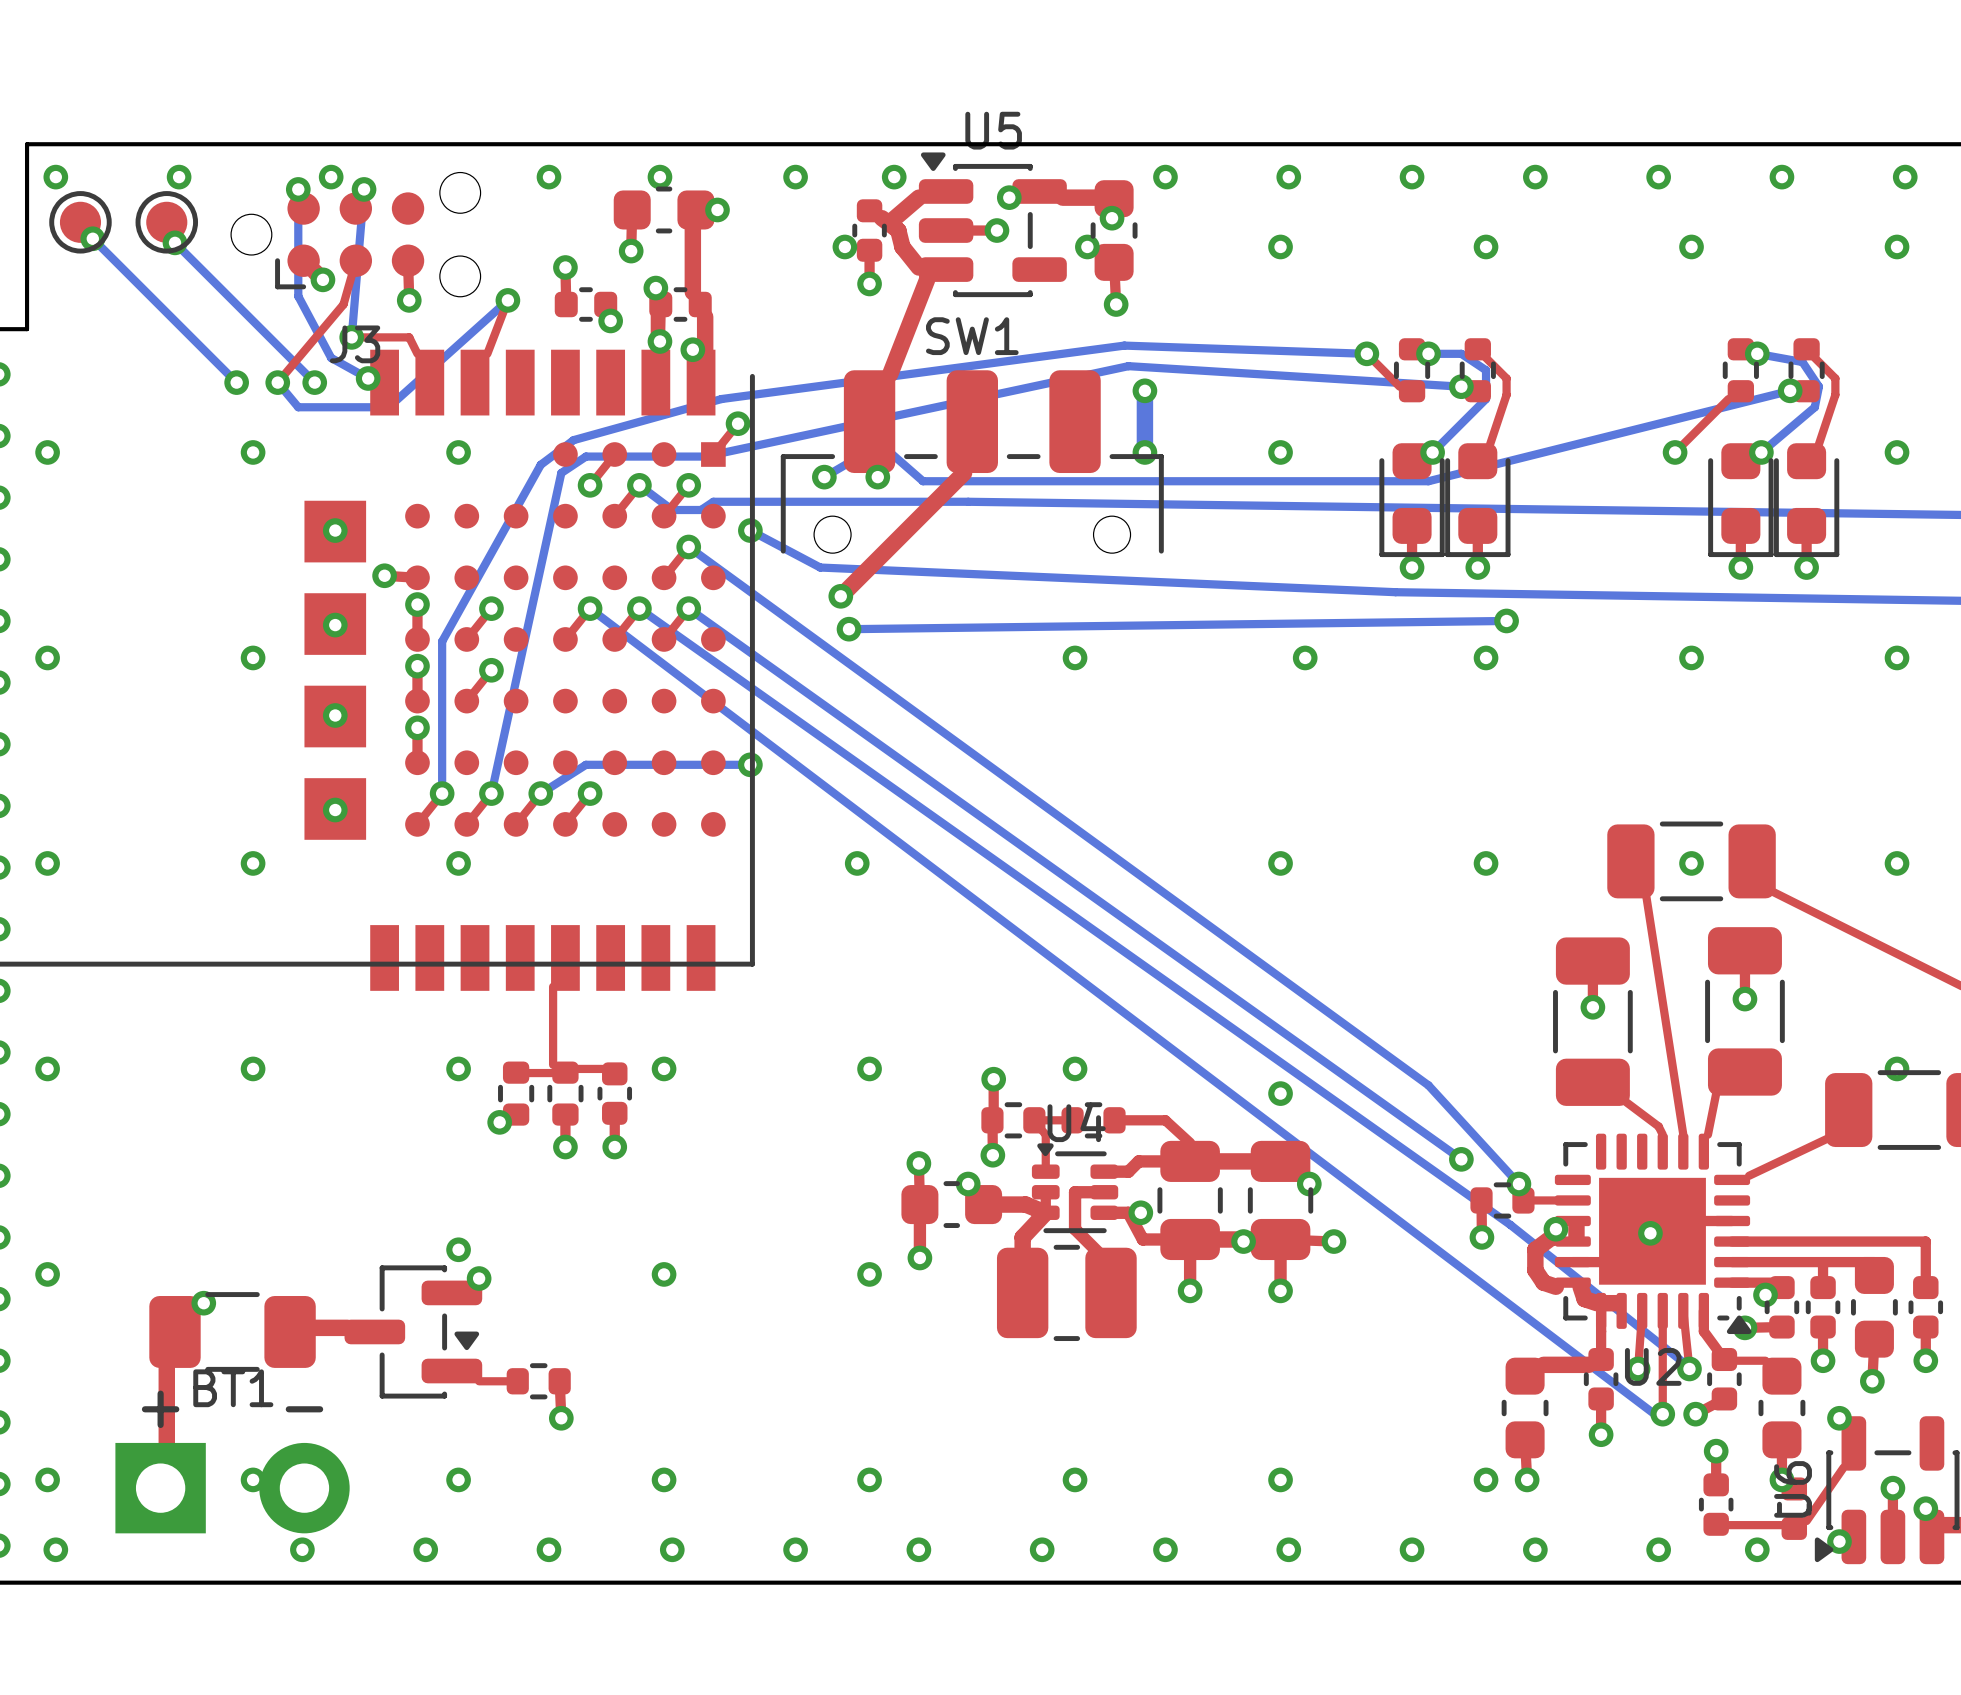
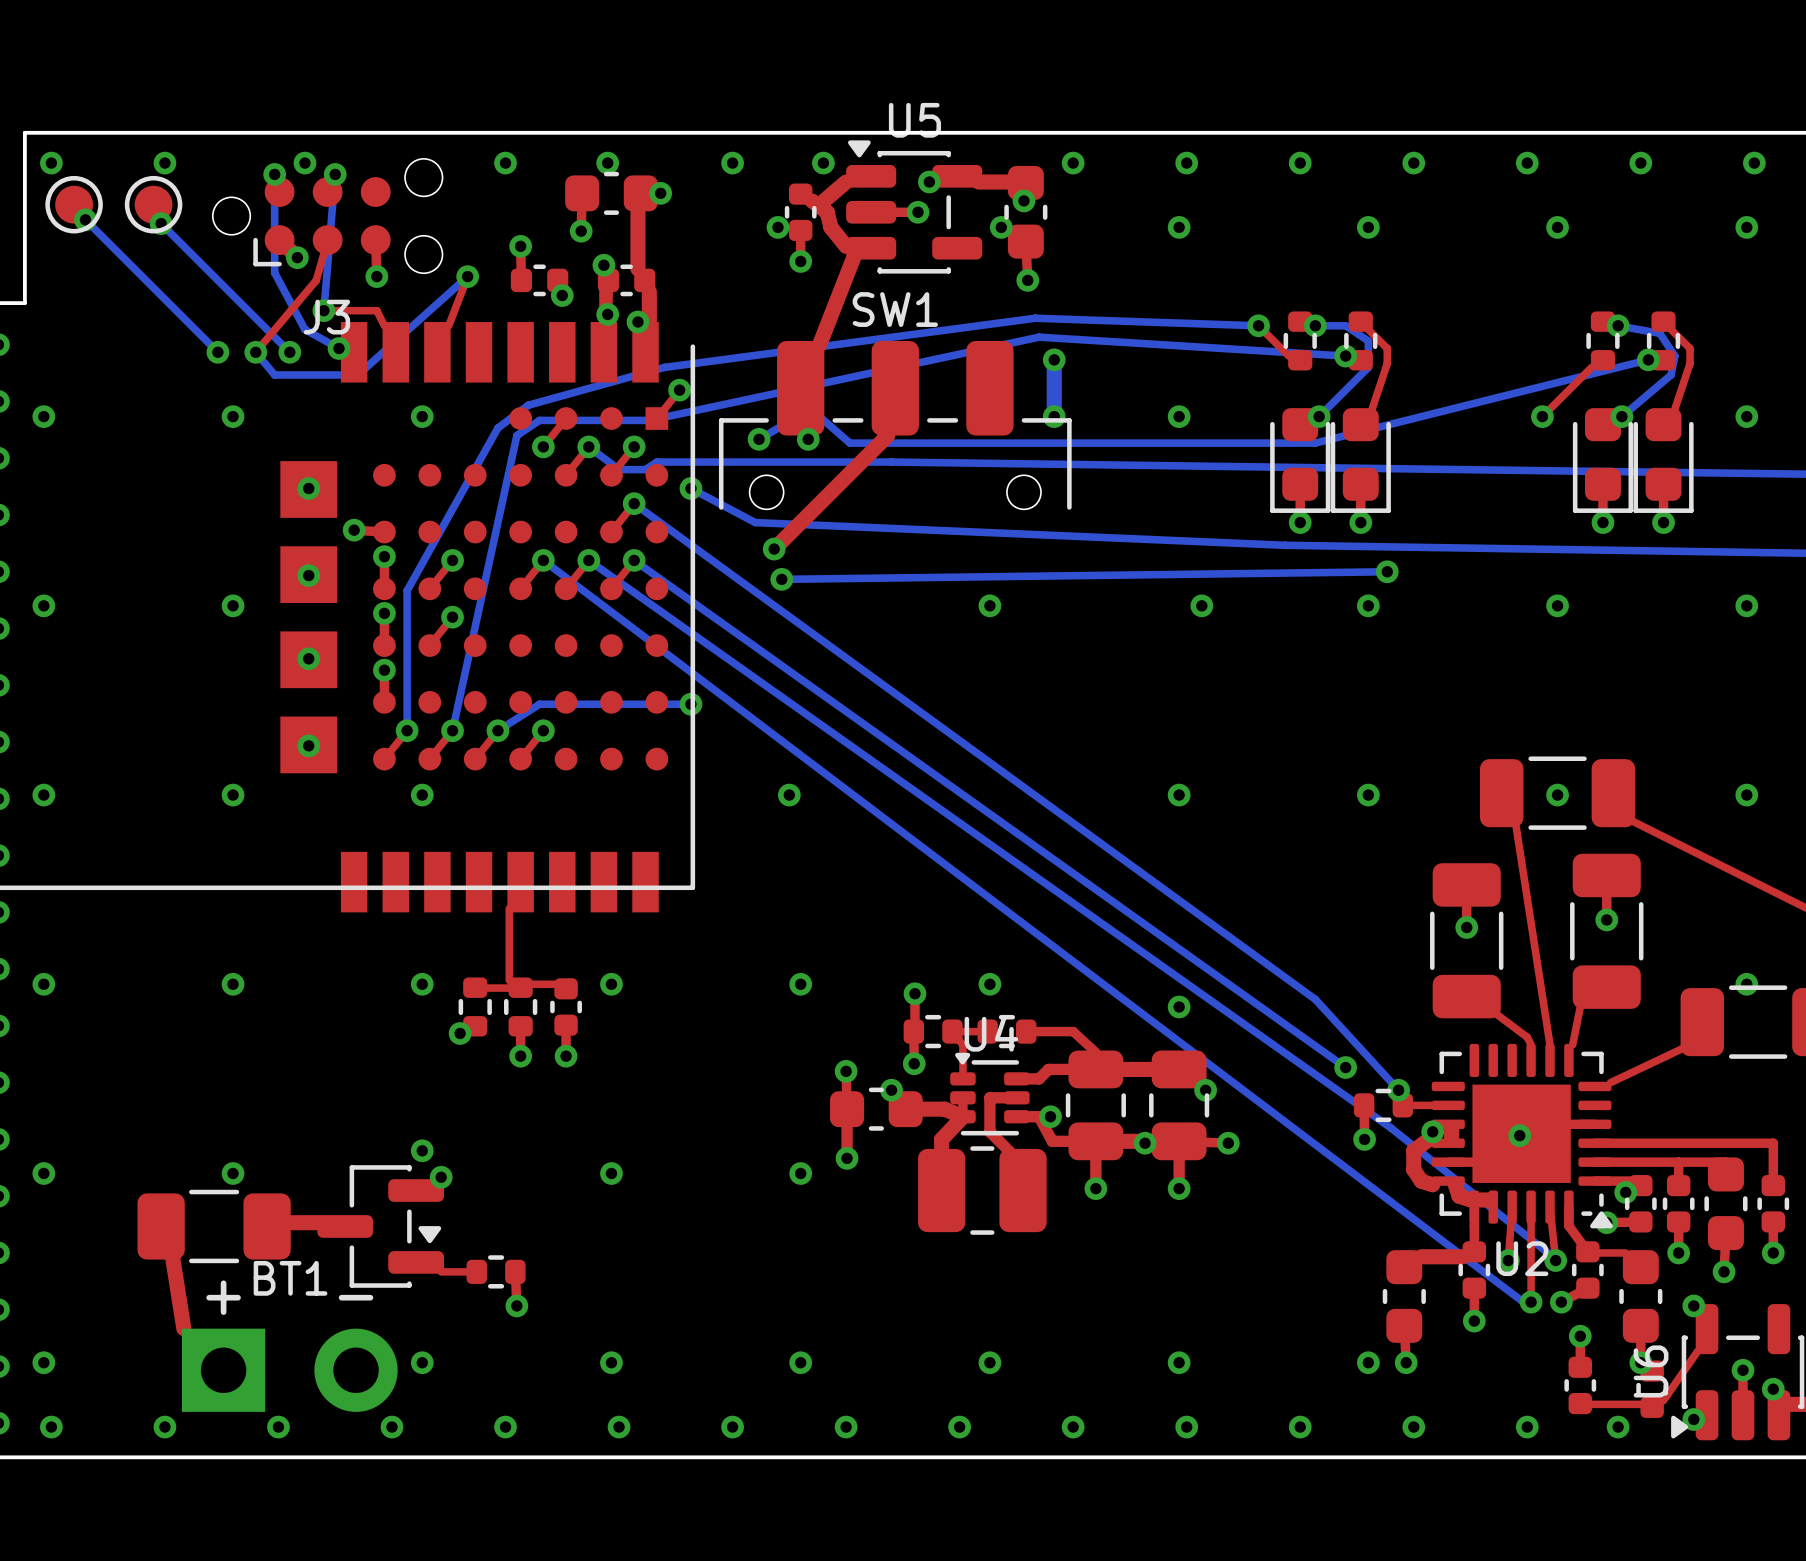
via position: (203, 1303) -> (233, 1173)
top track: (166, 1364) (166, 1442) -> none
top track: none -> (172, 1256) (183, 1328)
via position: (253, 1479) -> (164, 1427)
BT1 position: (232, 1488) -> (289, 1370)

